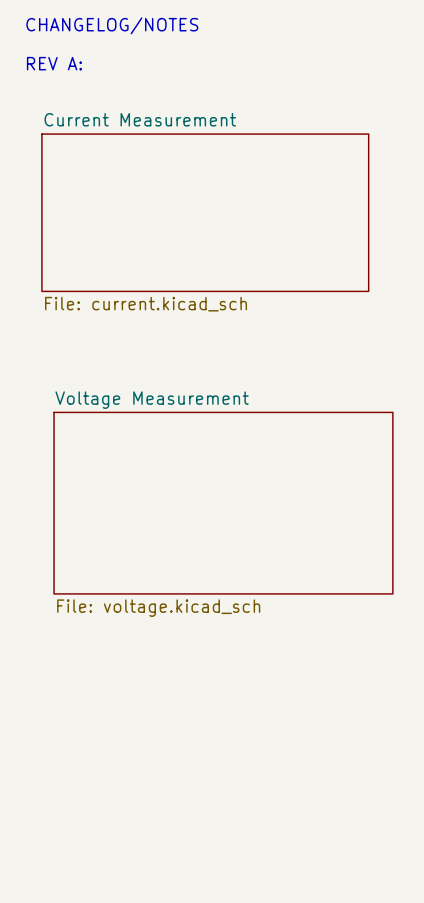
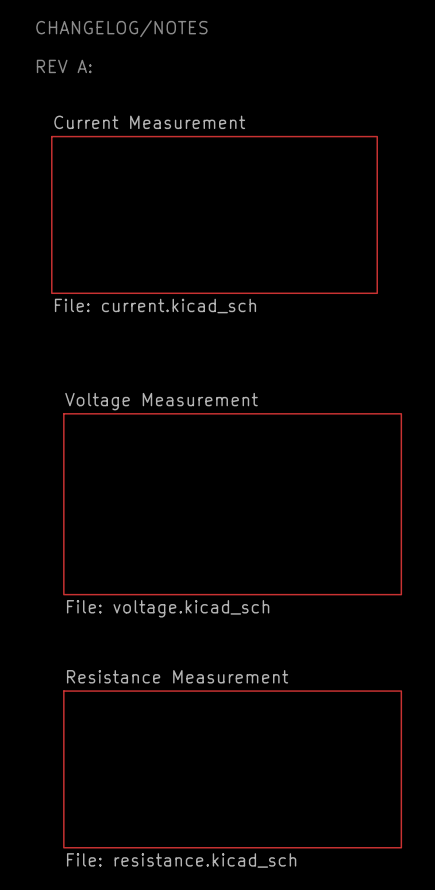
sheet Resistance Measurement: none -> File: resistance.kicad_sch (232, 769)

